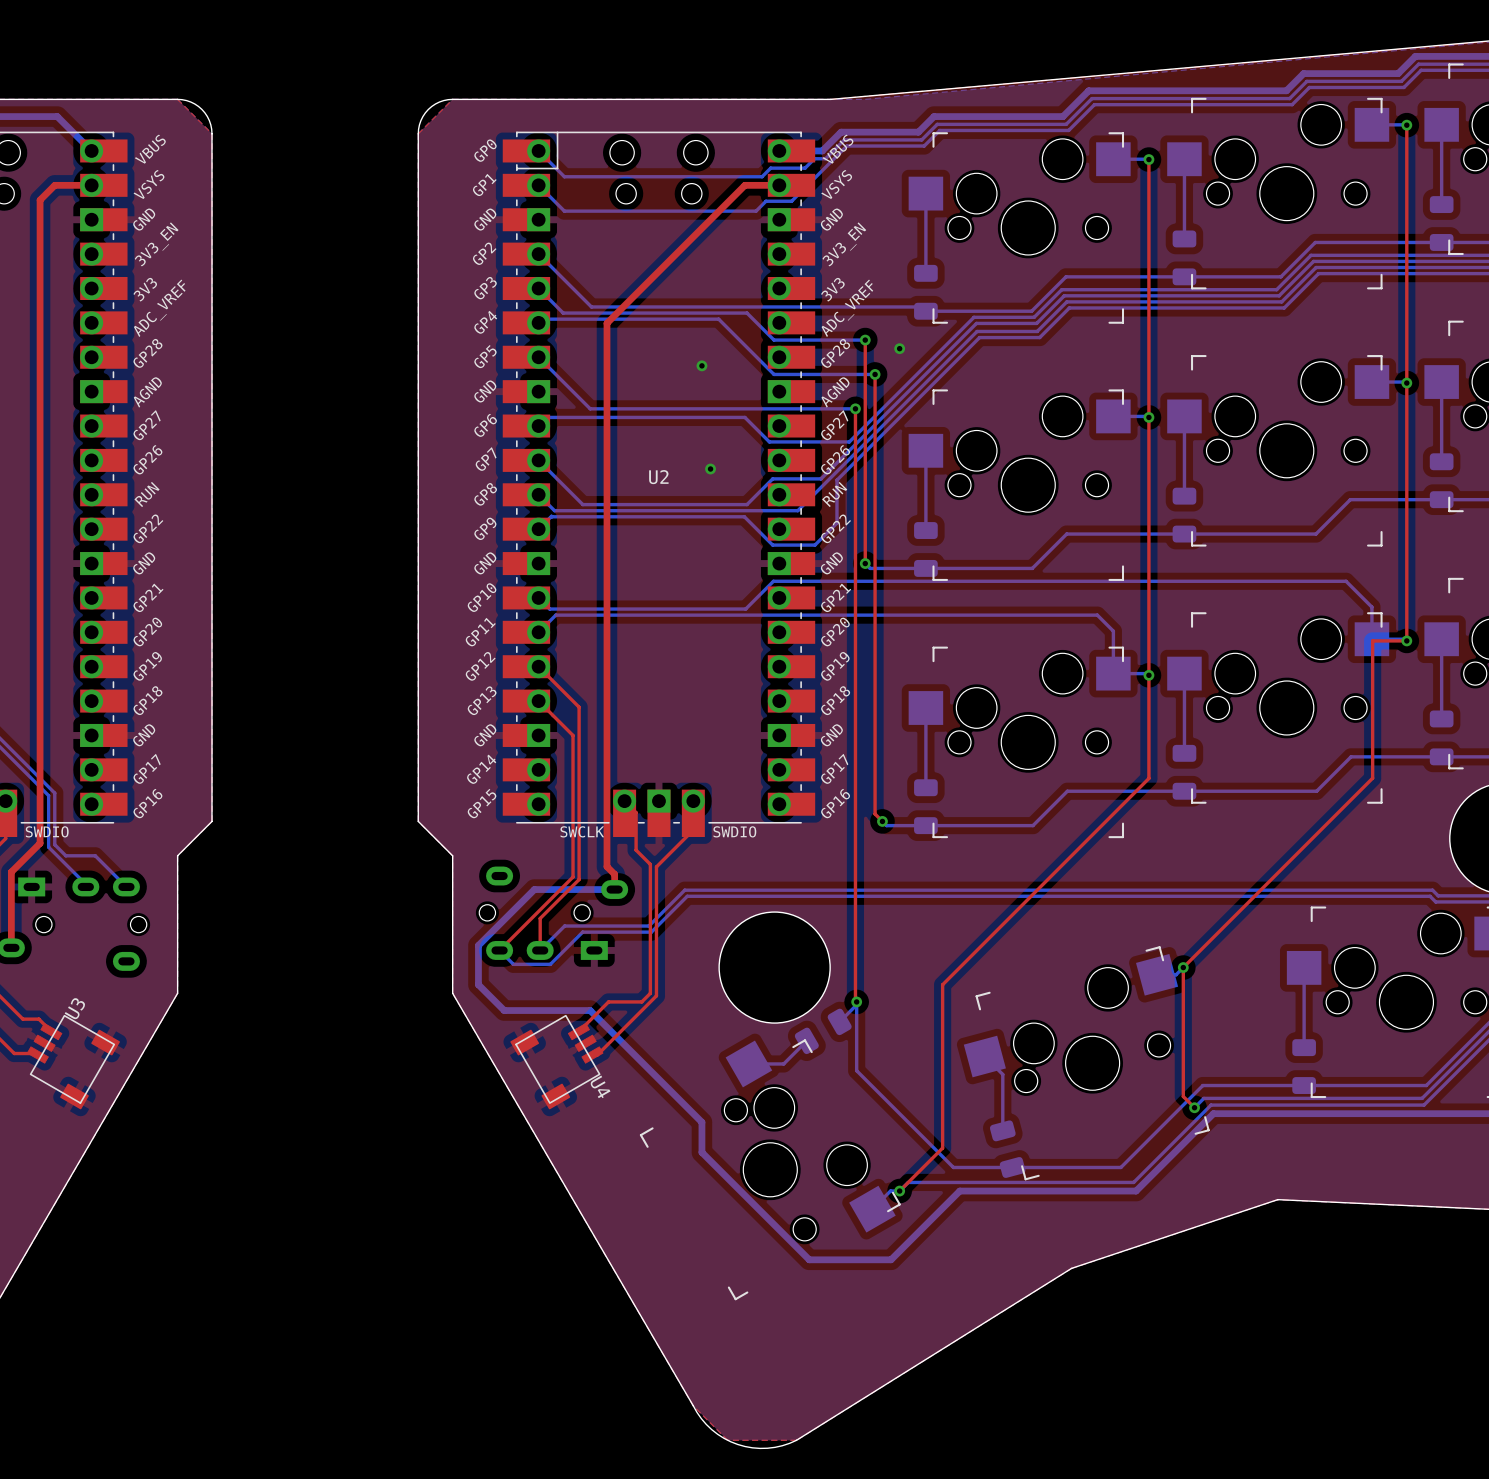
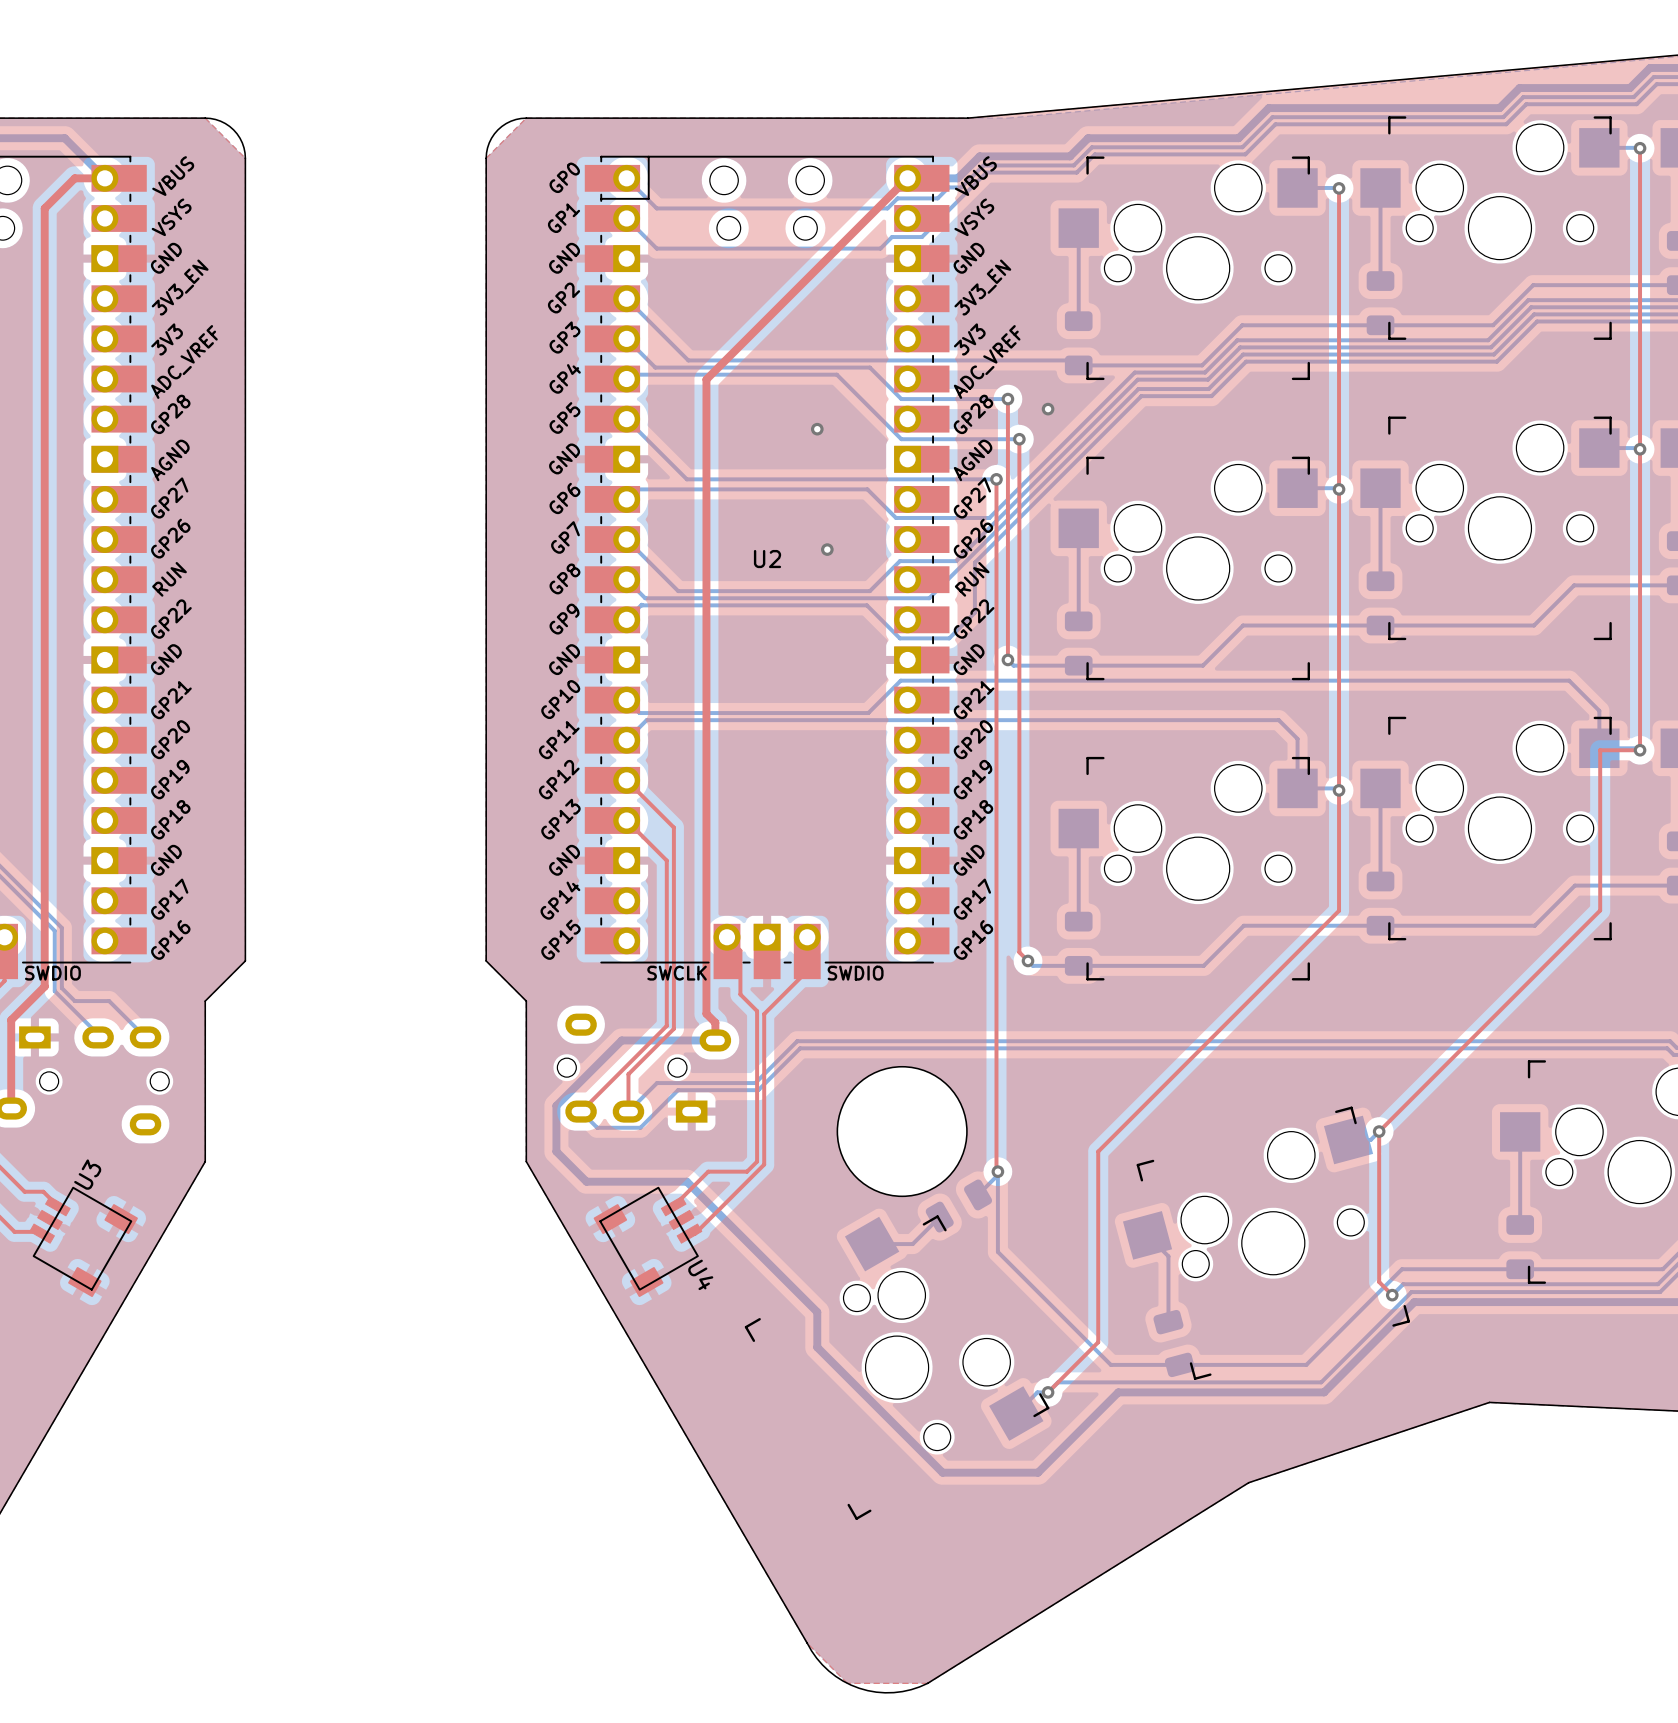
top track: (91, 185) (54, 185) (40, 200) -> (104, 178) (74, 178) (44, 208) (44, 235)
top track: (744, 185) (779, 185) -> (867, 218) (907, 178)

